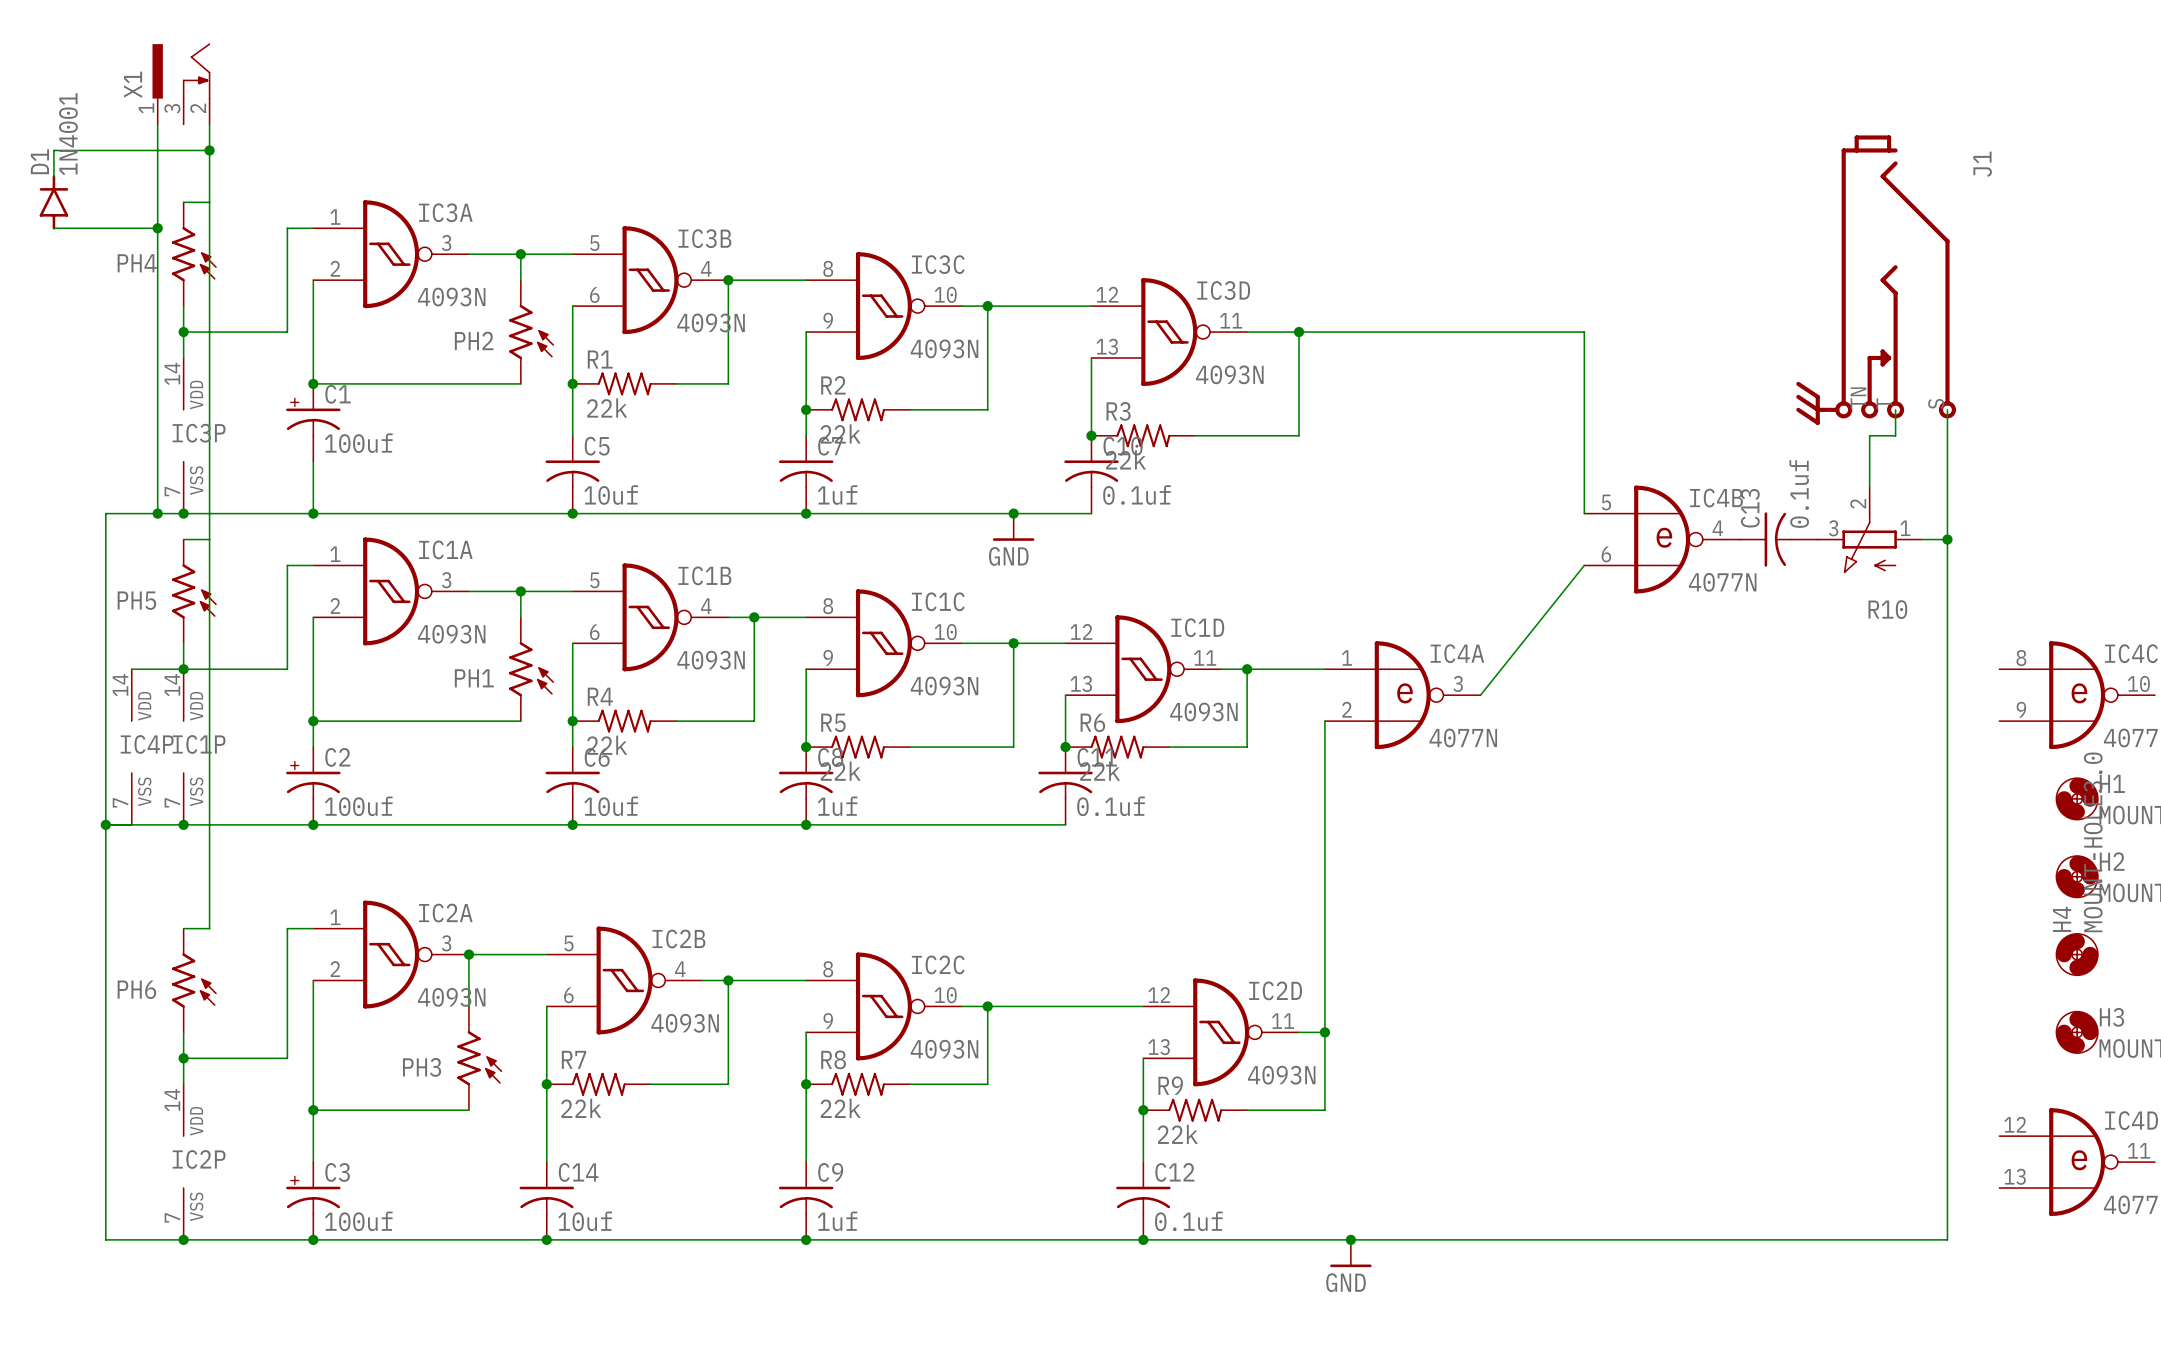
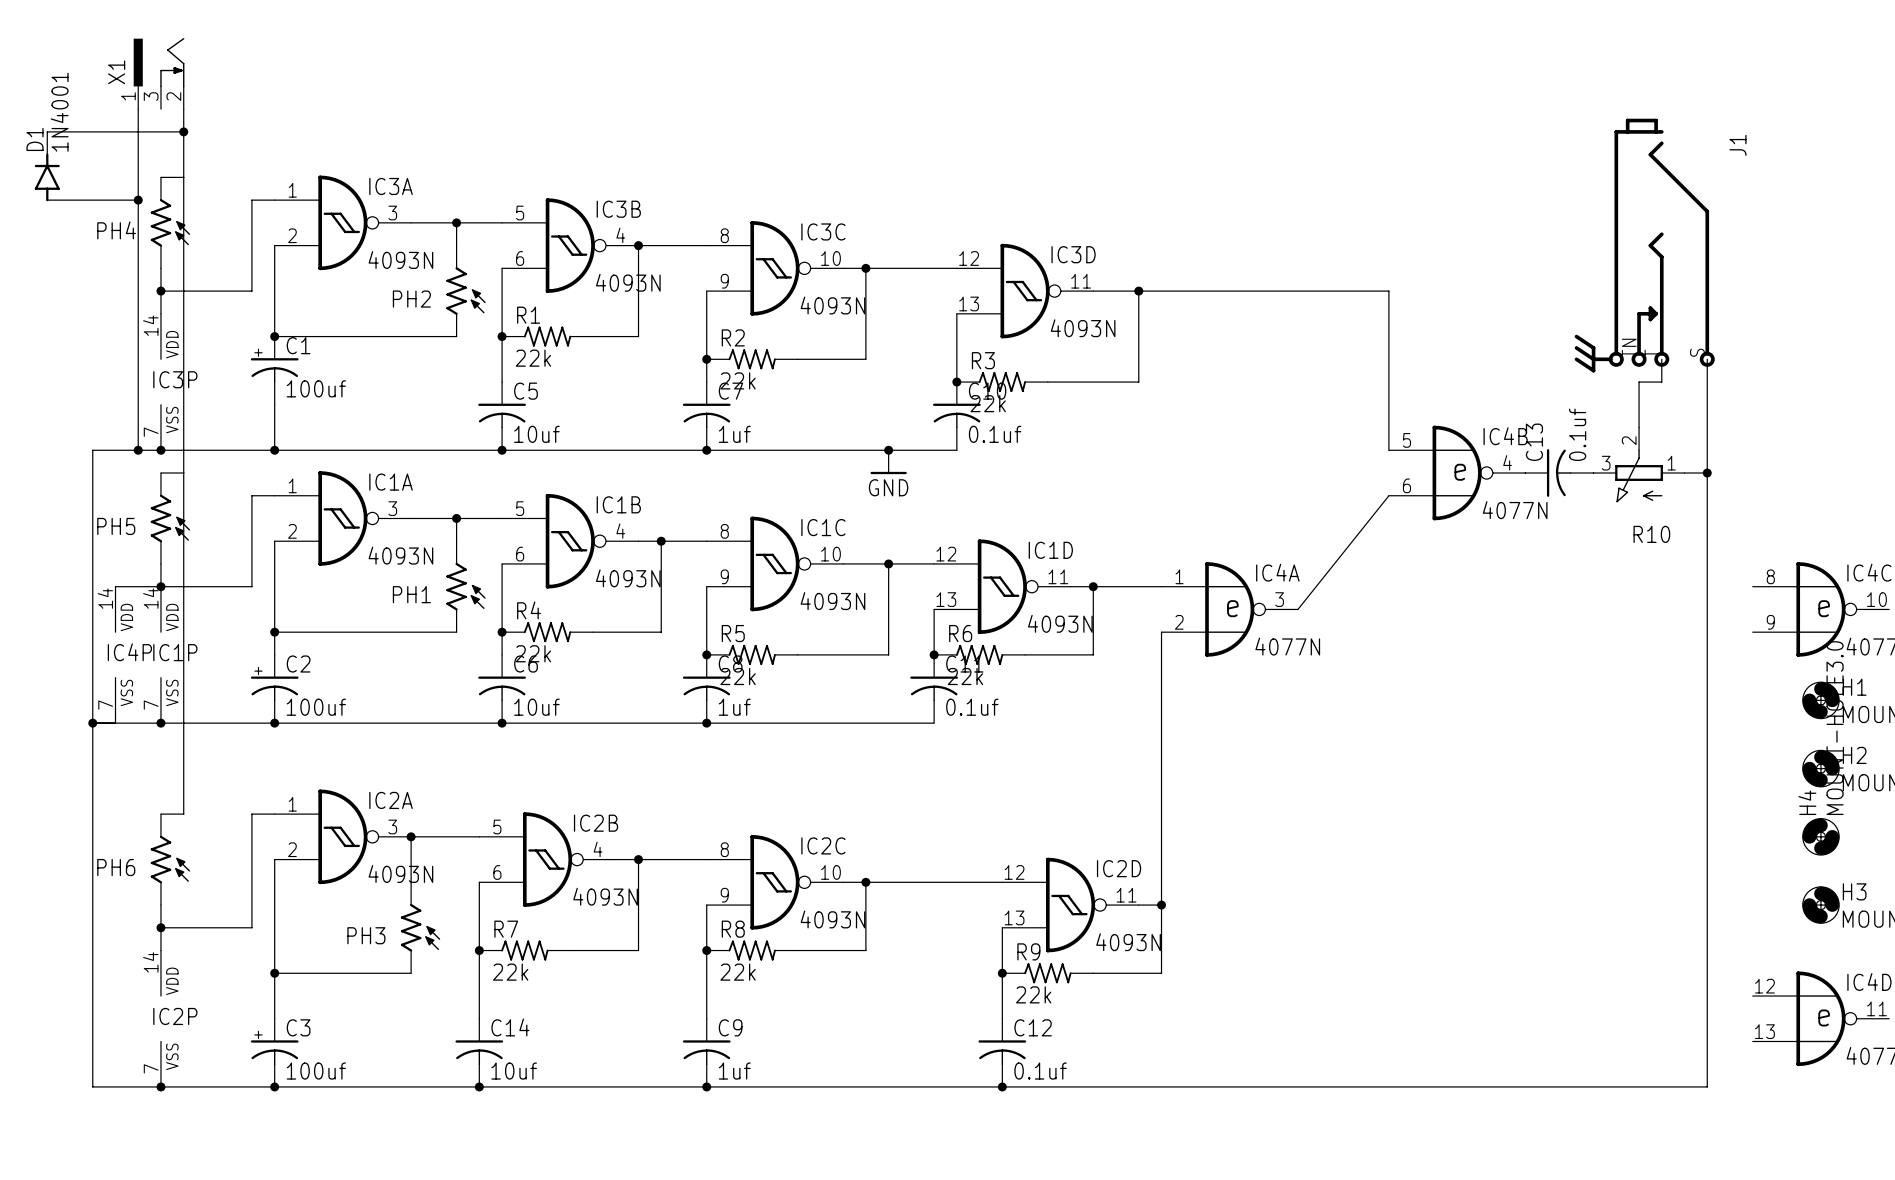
junction: (1350, 1239) -> none
power symbol: GND (1350, 1253) -> none

